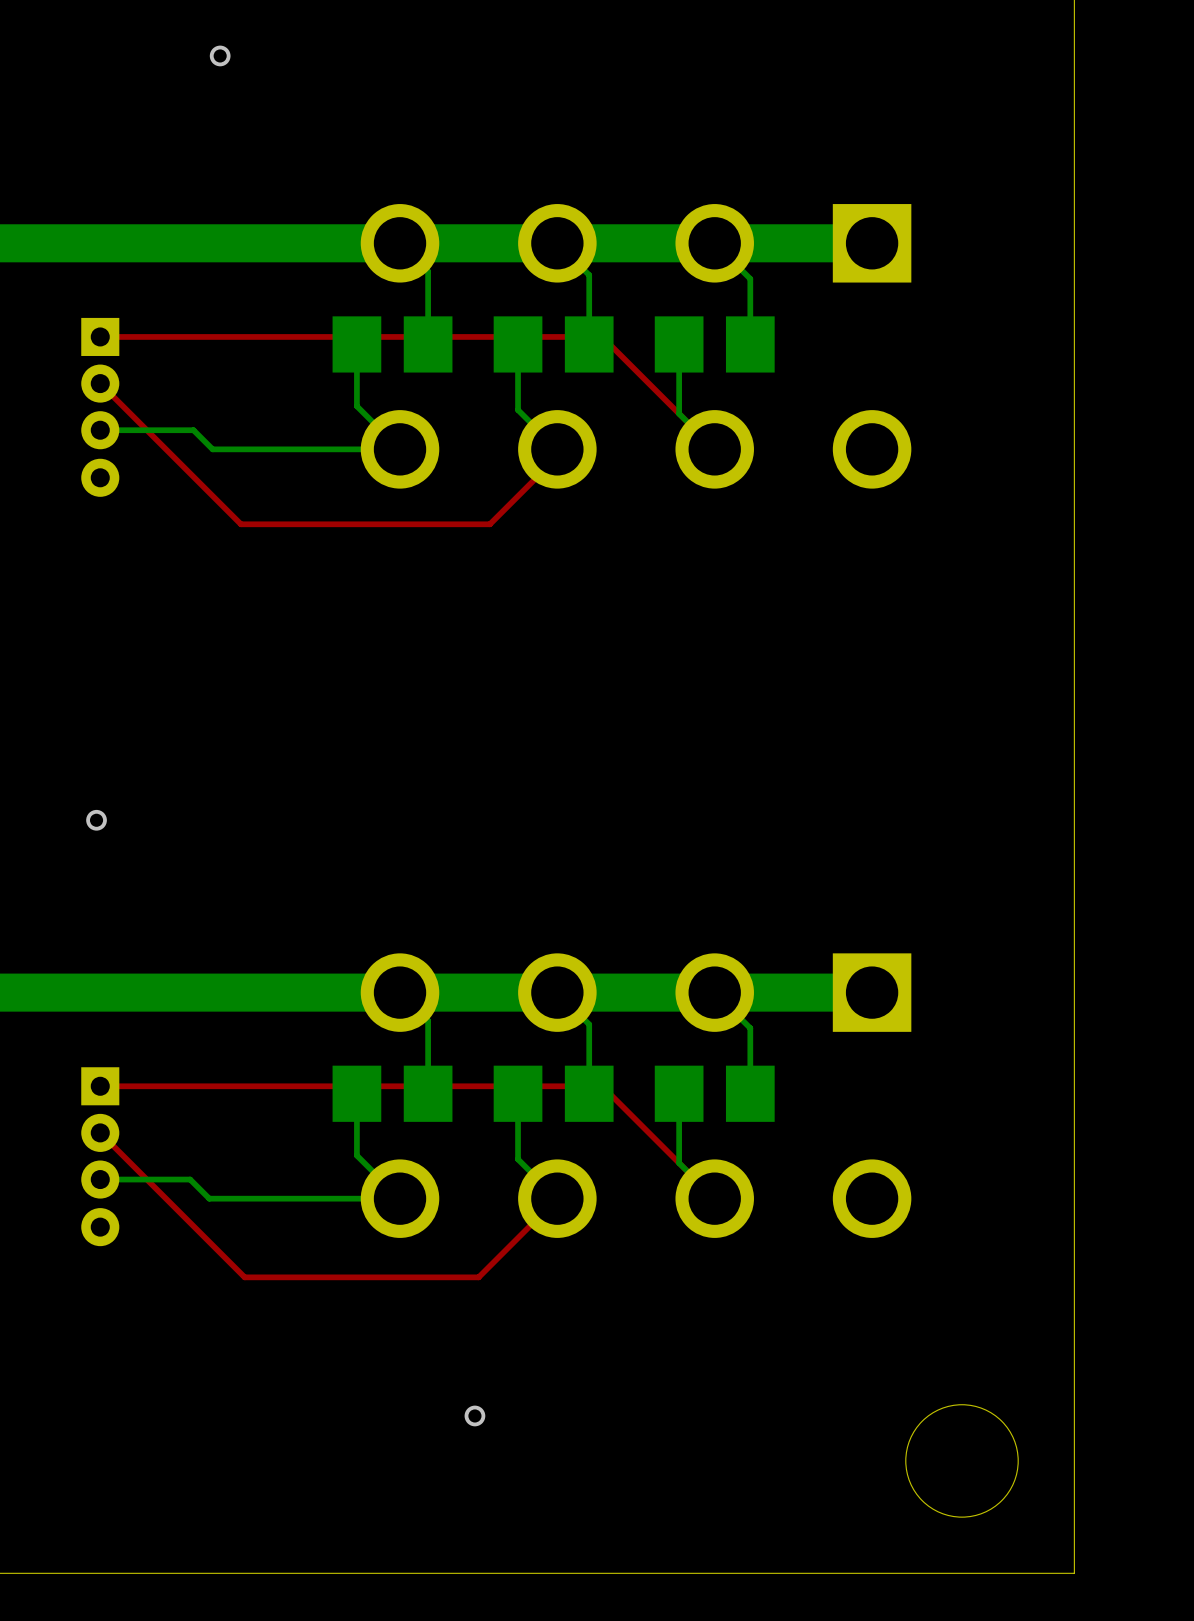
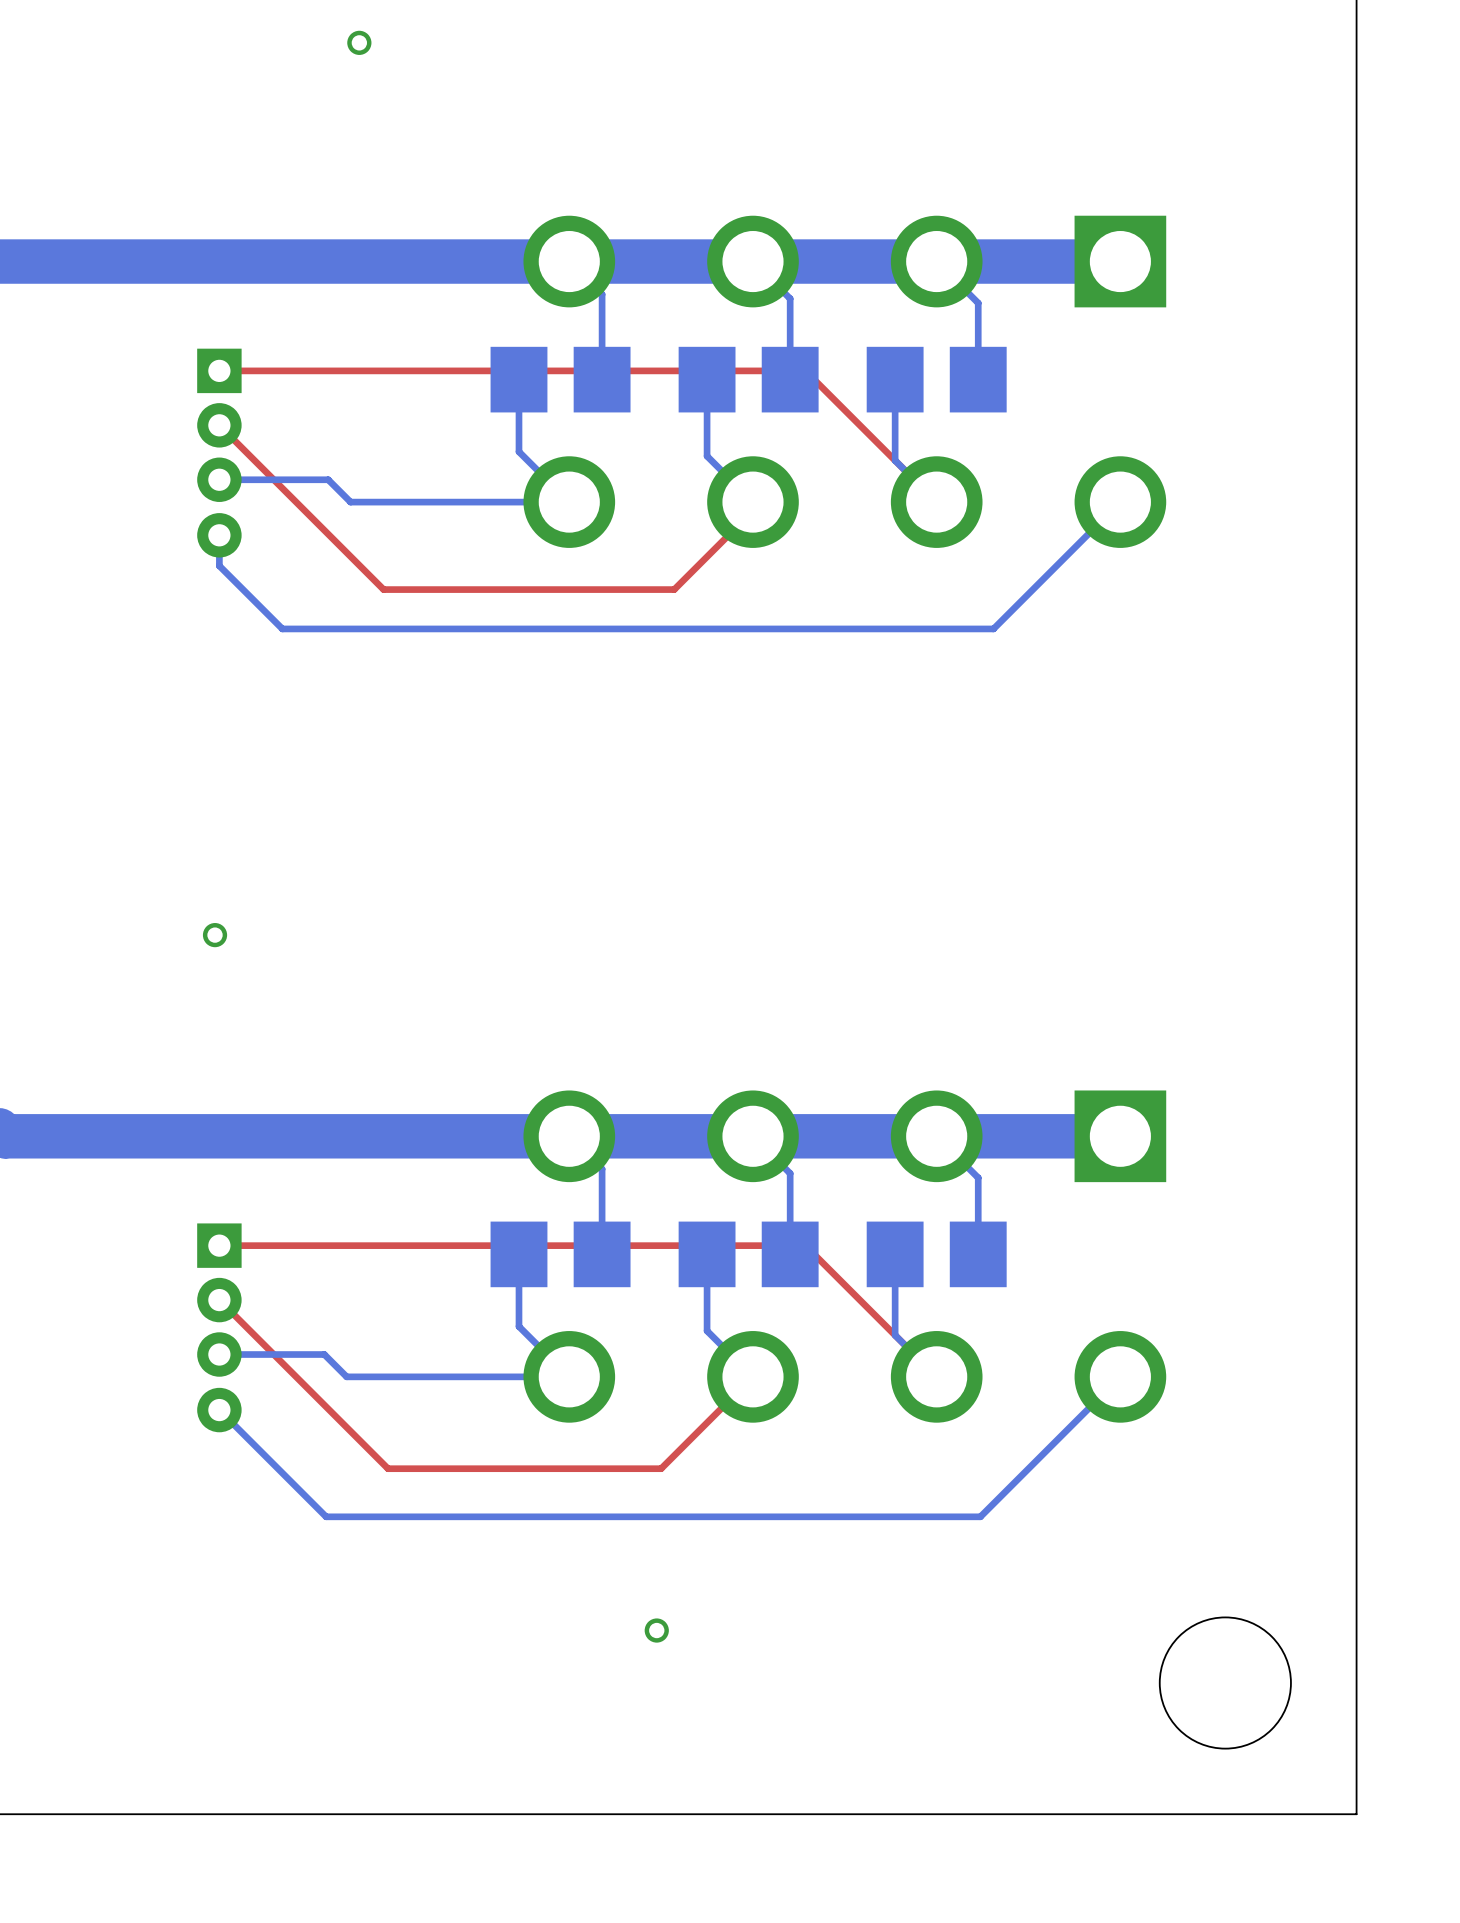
bottom track: none -> (1120, 502) (993, 628) (282, 628) (219, 565) (219, 535)
bottom track: none -> (1120, 1376) (980, 1516) (326, 1516) (219, 1410)

